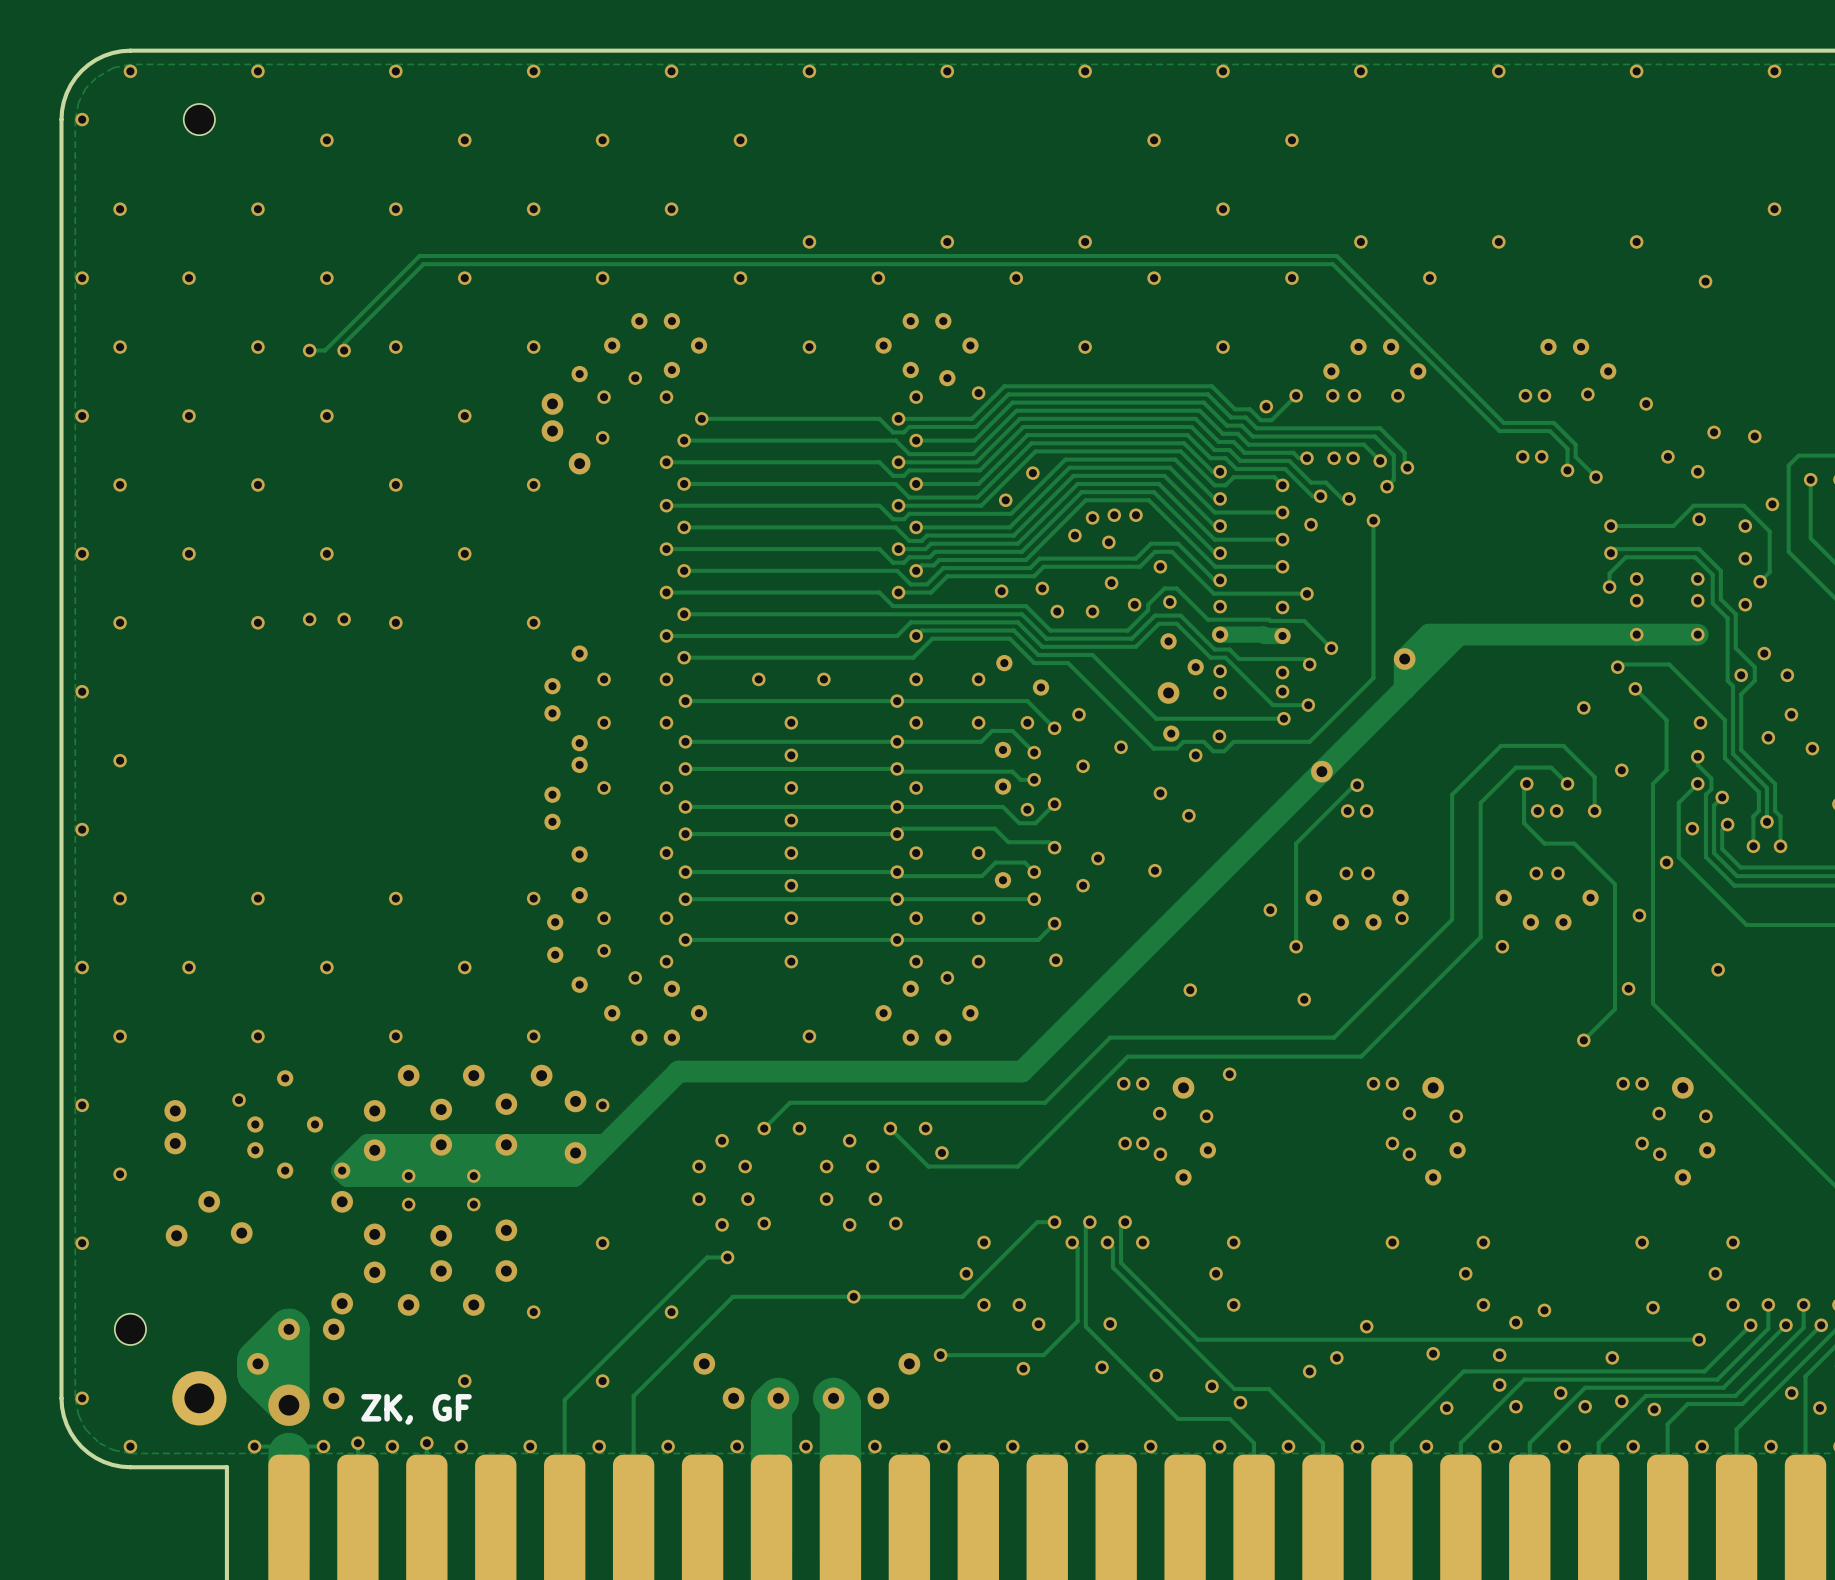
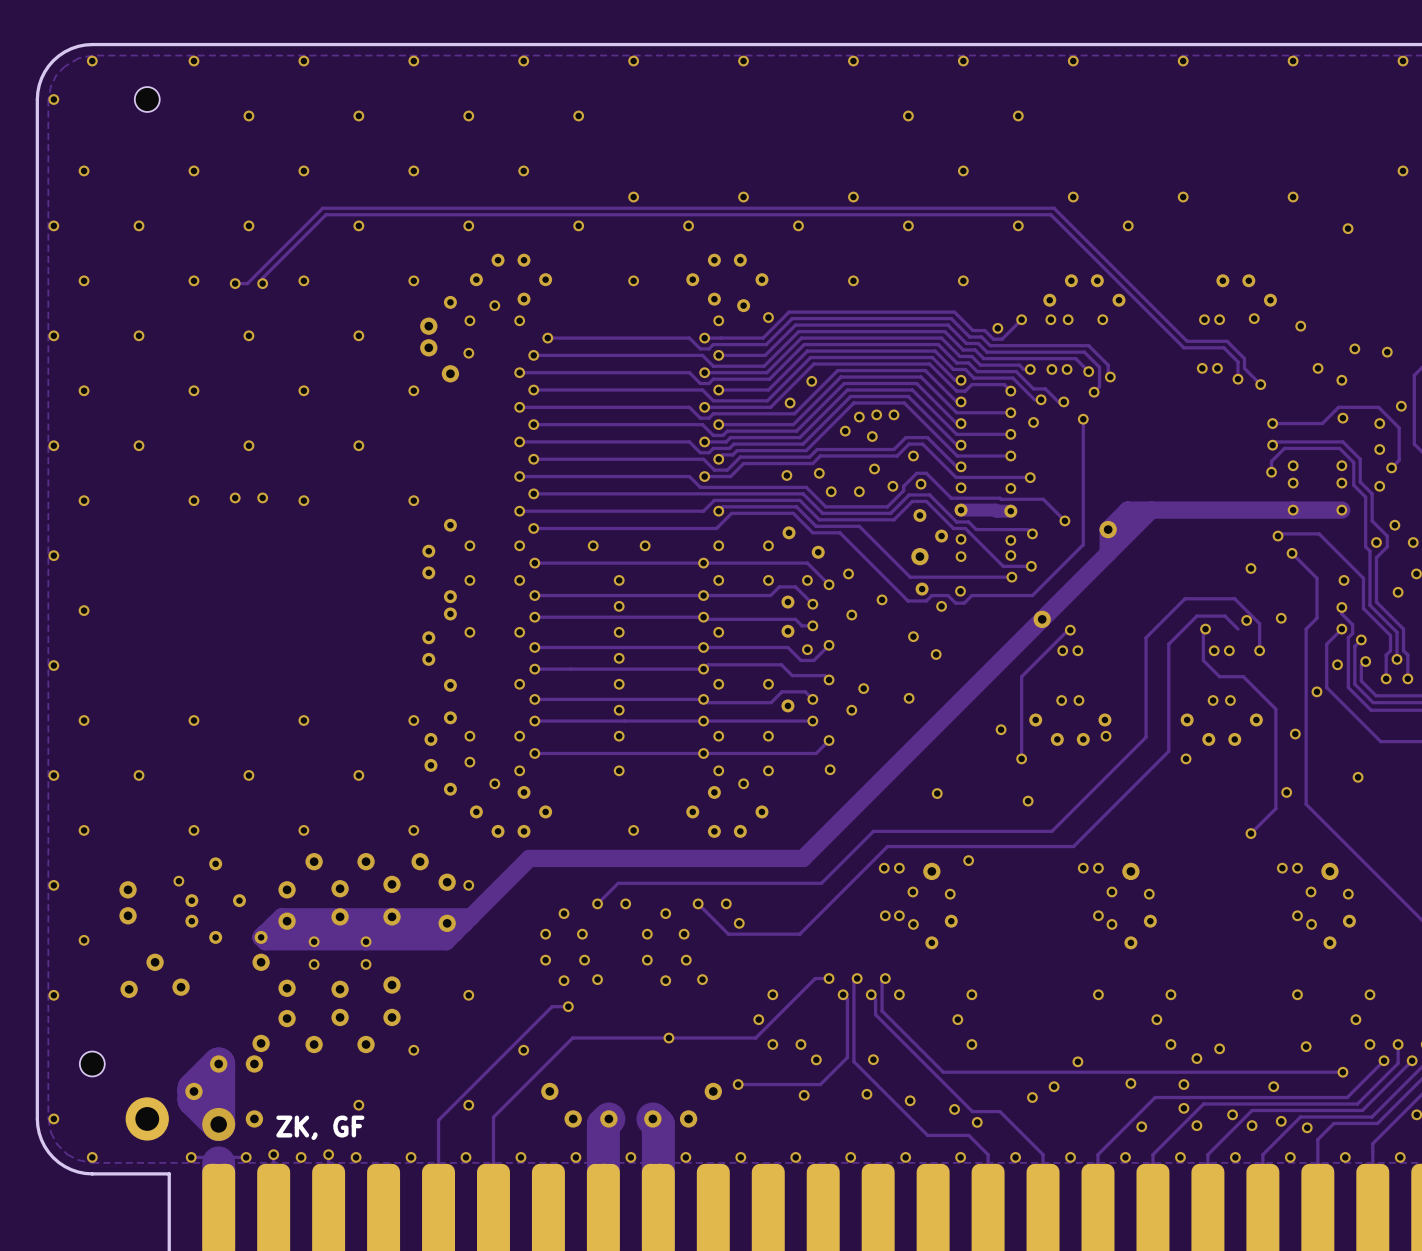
track: (1304, 621) (1331, 648) -> (1028, 499) (1043, 499) (1064, 520)
via position: (1331, 648) -> (1064, 520)
via position: (1567, 783) -> (1246, 620)

